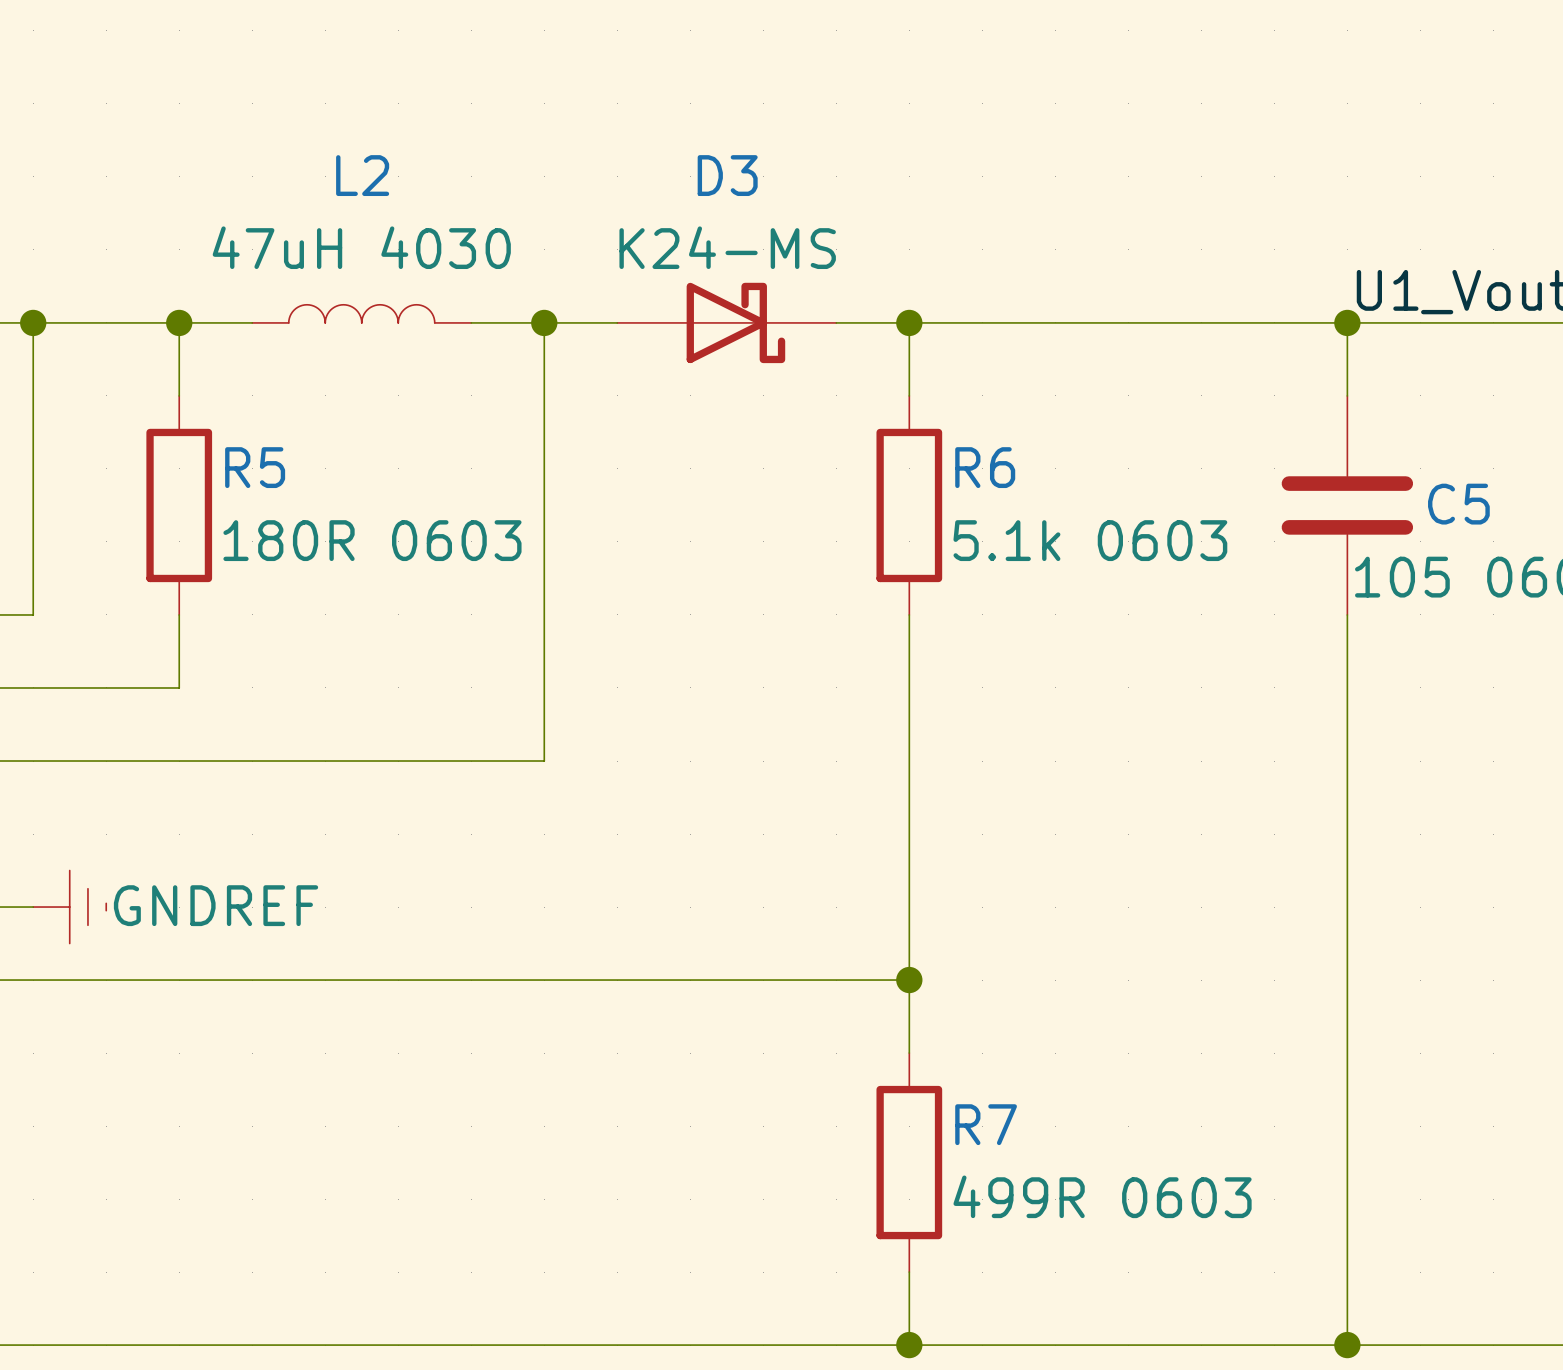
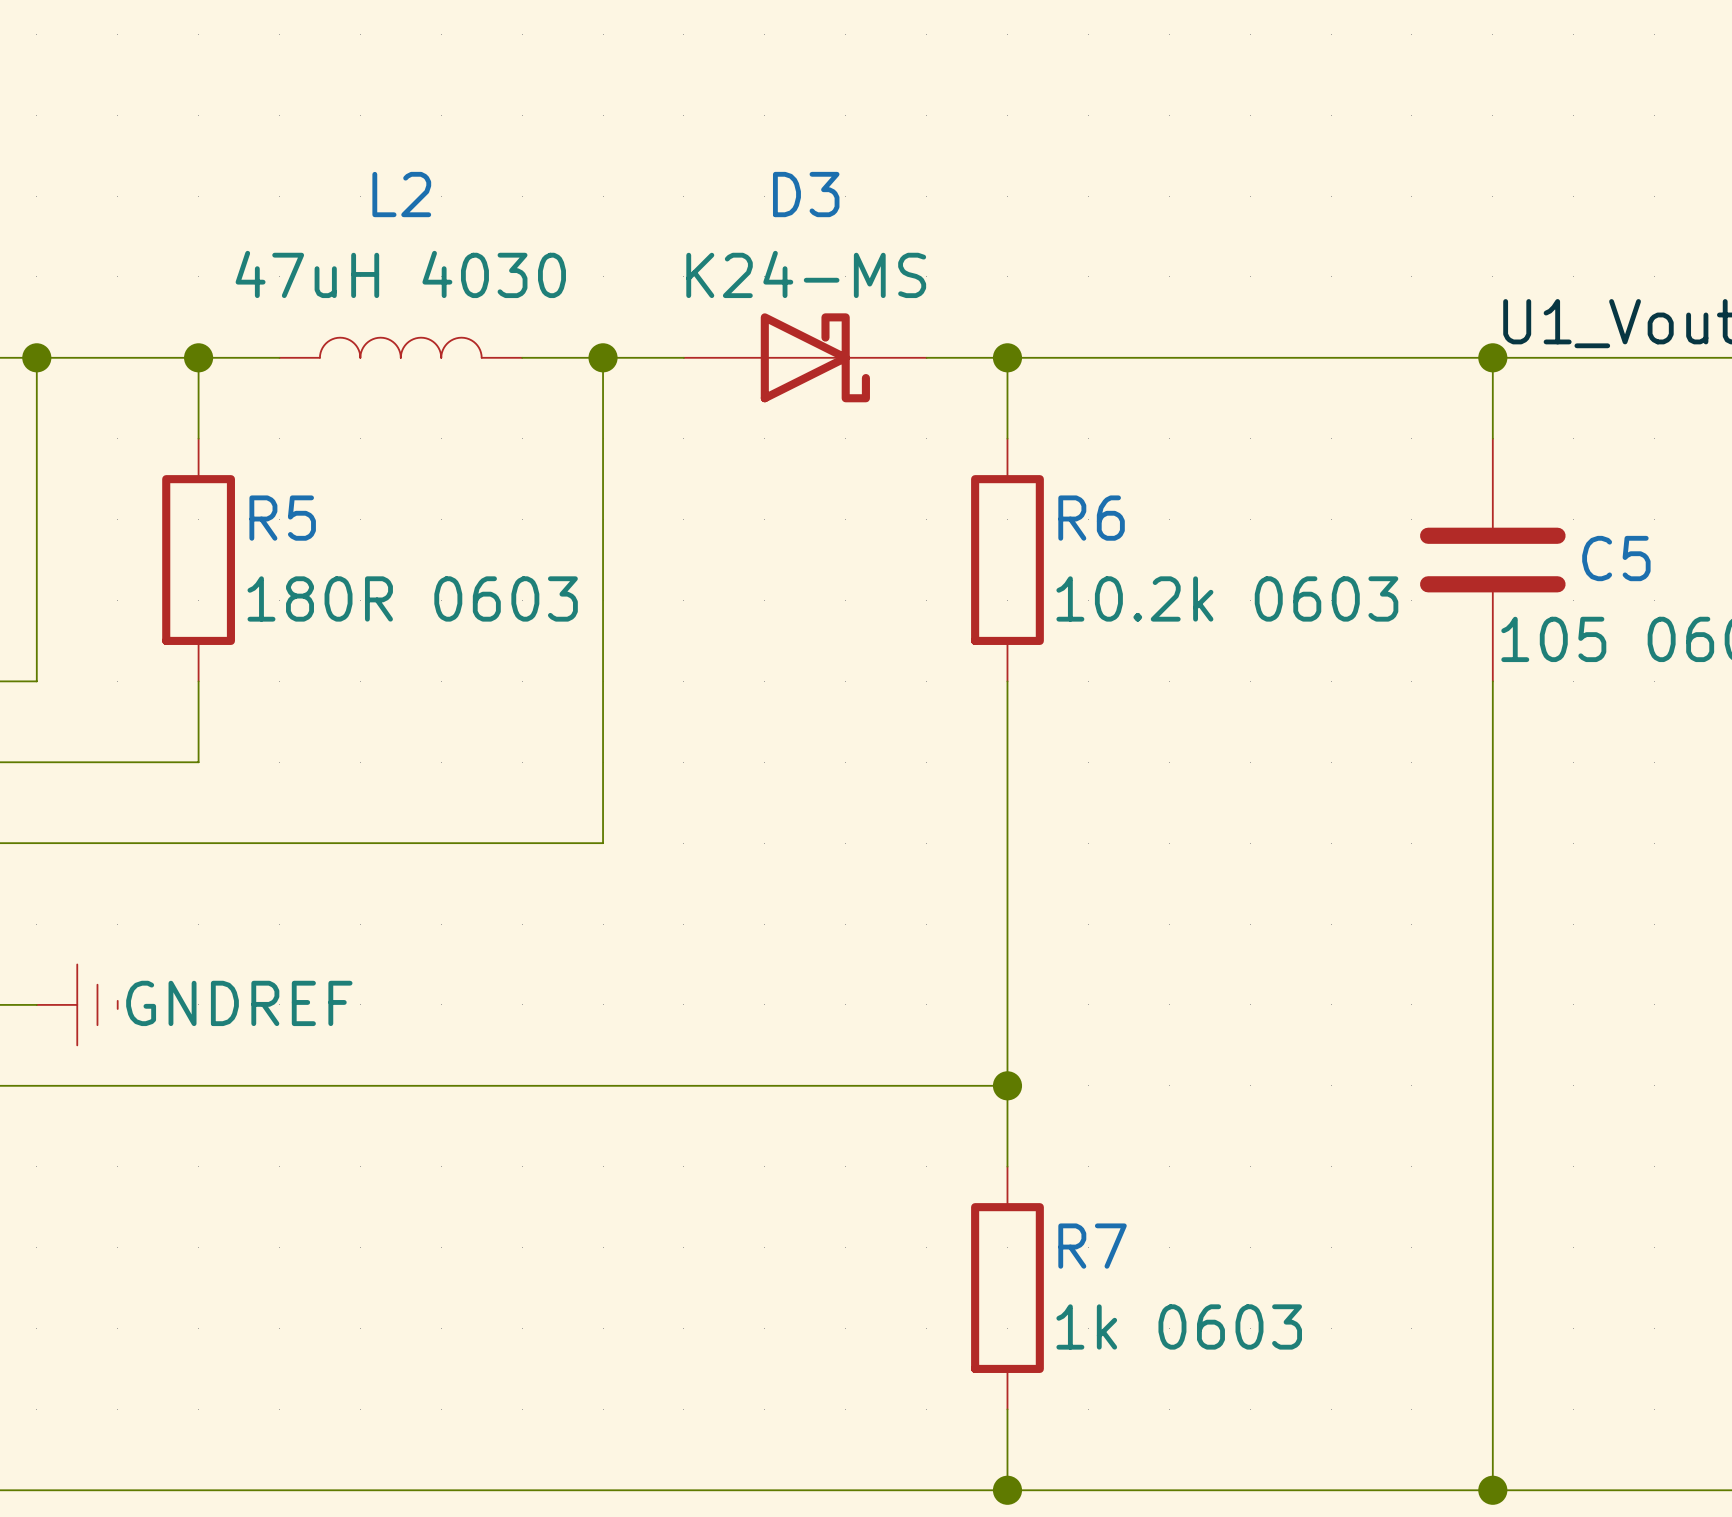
R6 value: 5.1k 0603 (1090, 540) -> 10.2k 0603 (1227, 598)
R7 value: 499R 0603 (1102, 1196) -> 1k 0603 (1179, 1326)

